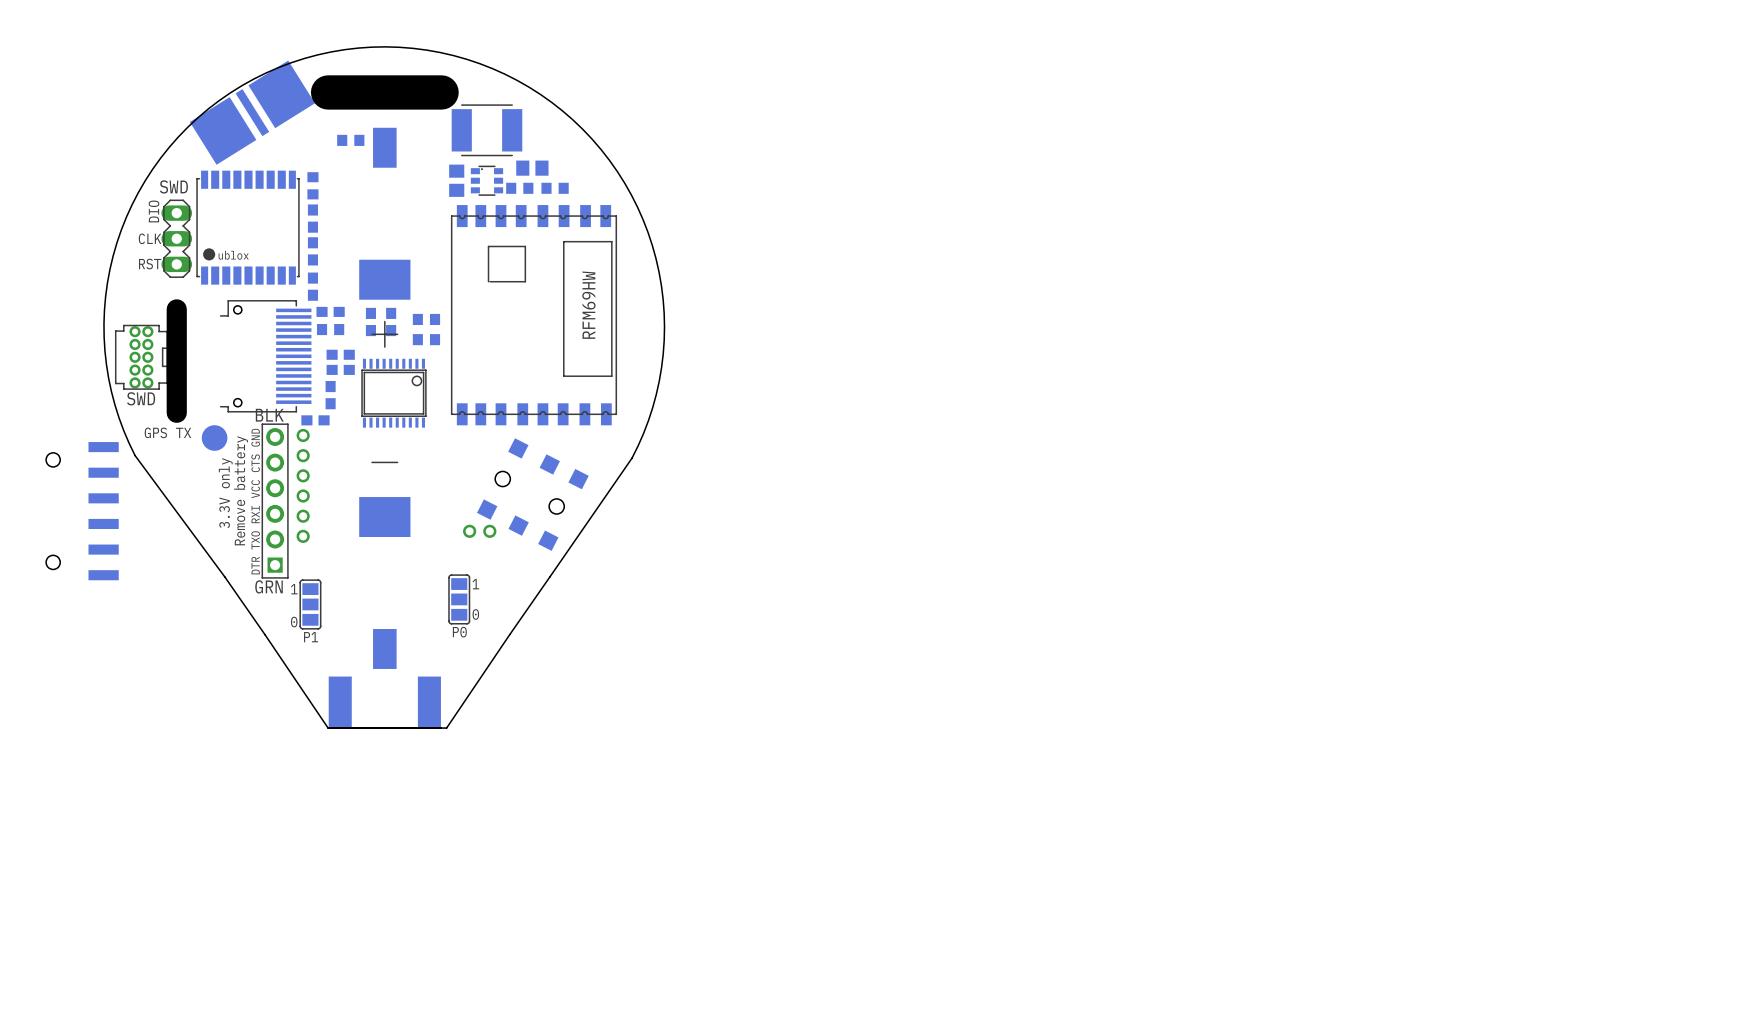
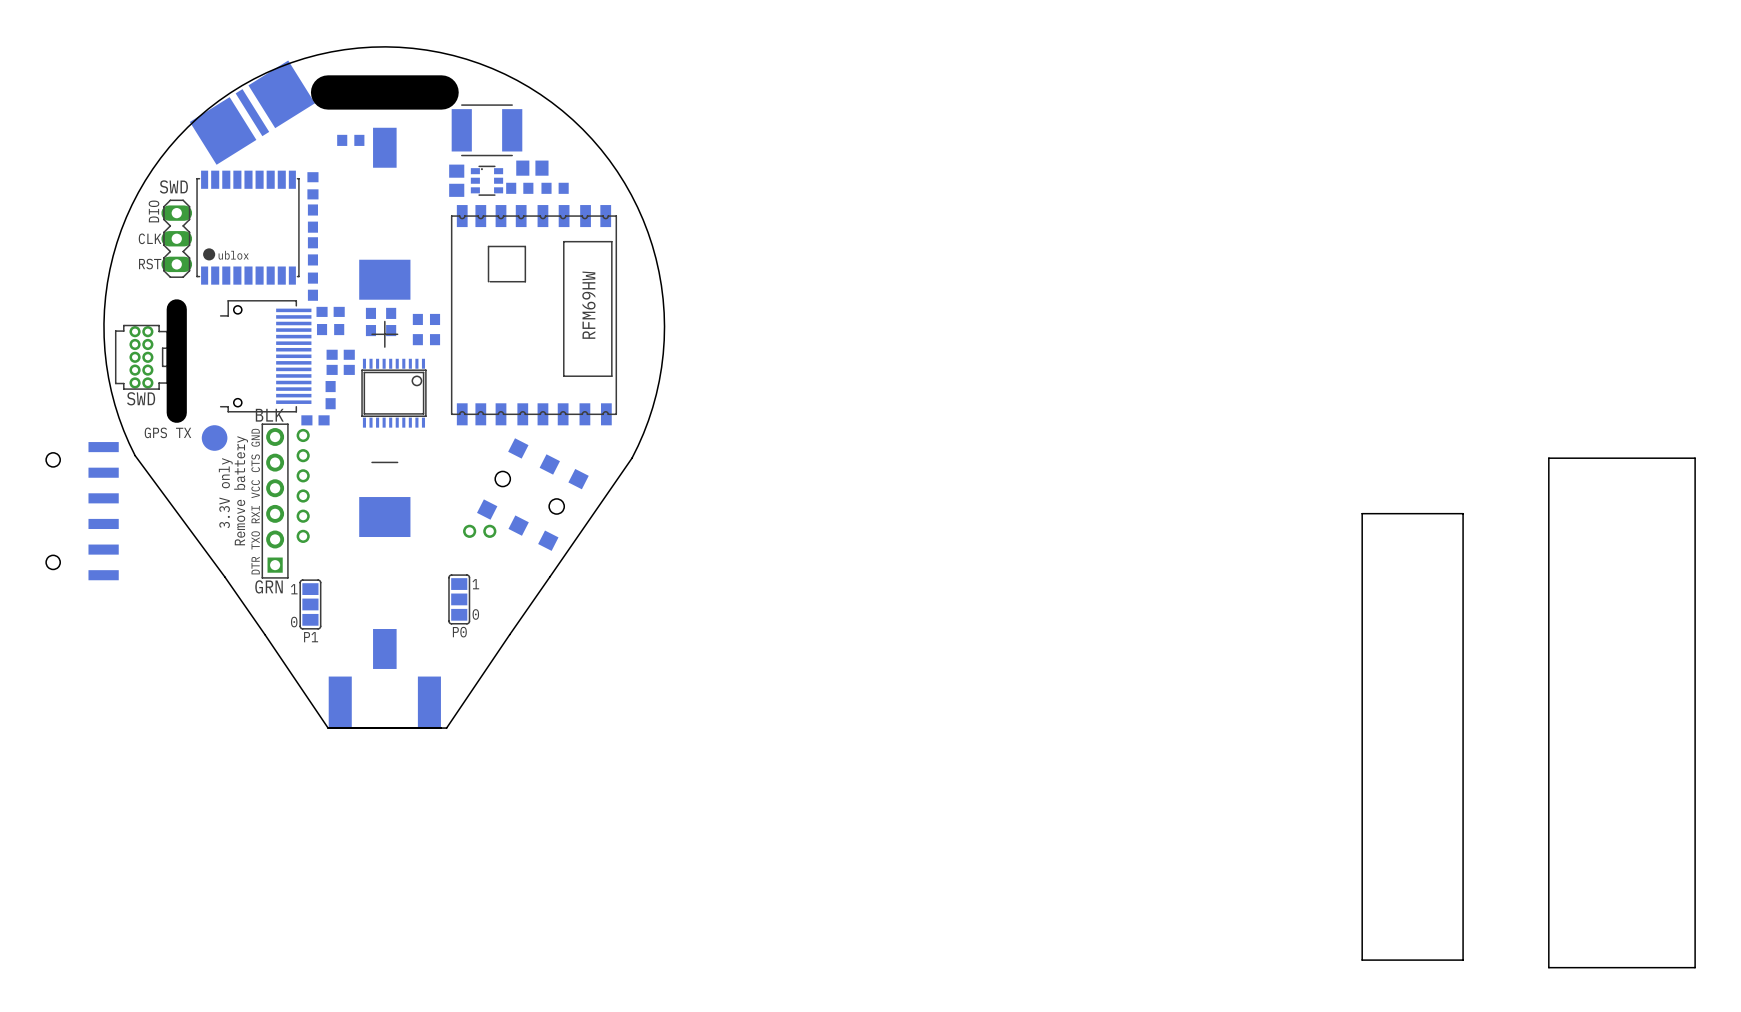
board edge: none -> (1695, 458) (1548, 458) (1548, 967) (1695, 967) (1695, 458)
board edge: none -> (1463, 513) (1362, 513) (1362, 960) (1463, 960) (1463, 513)

